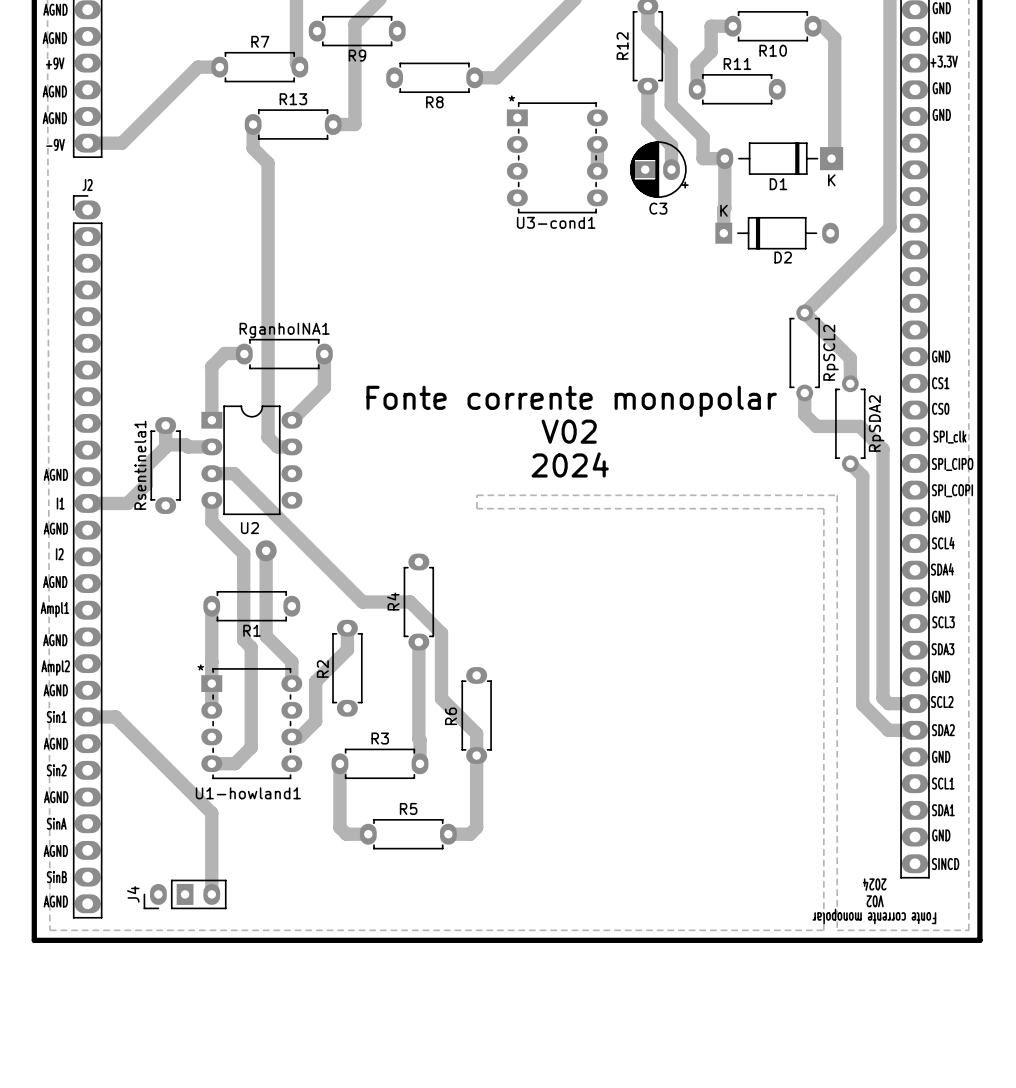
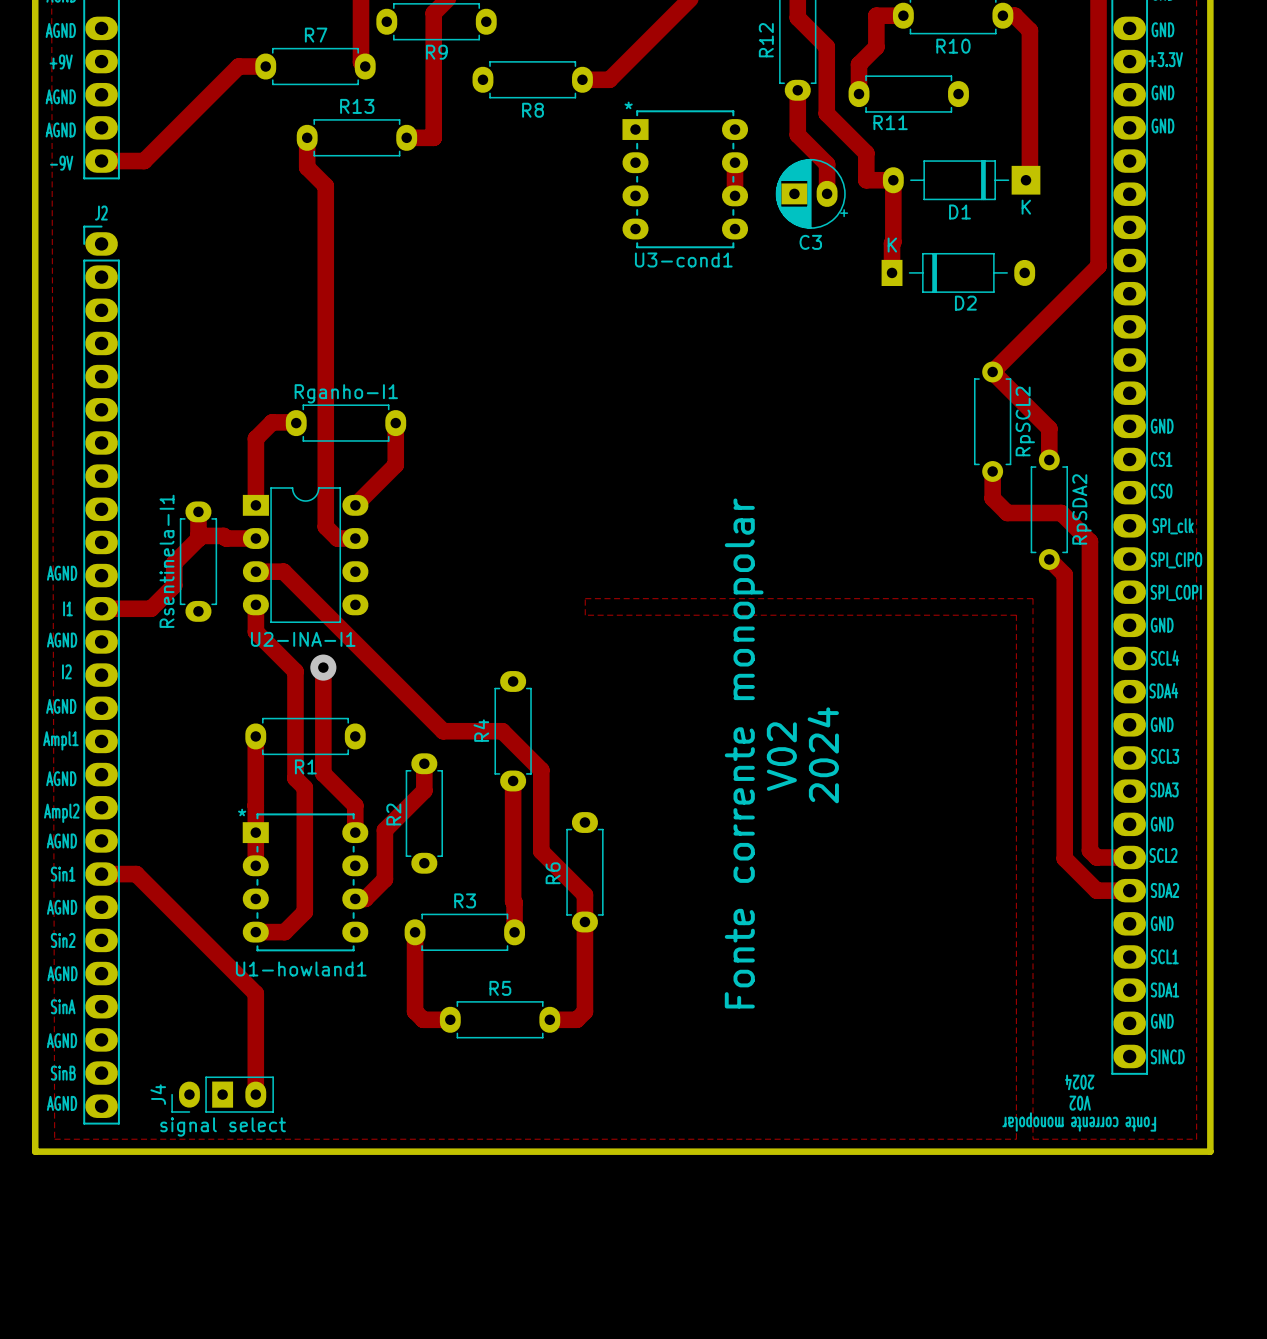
R11 name position: R11 (737, 63) -> R11 (890, 122)
RganhoINA1 name: RganhoINA1 (284, 330) -> Rganho-I1 (346, 393)
text rotation: 0° (571, 401) -> 90° counterclockwise (744, 753)
text rotation: 0° (569, 431) -> 90° counterclockwise (781, 756)
text position: V02 (569, 431) -> V02 (781, 756)
text rotation: 0° (570, 464) -> 90° counterclockwise (823, 755)
text position: 2024 (570, 464) -> 2024 (823, 755)
Rsentinela1 name: Rsentinela1 (140, 465) -> Rsentinela-I1 (167, 561)
U2 name: U2 (249, 528) -> U2-INA-I1 (303, 639)
J4 value: none -> signal select (223, 1126)

